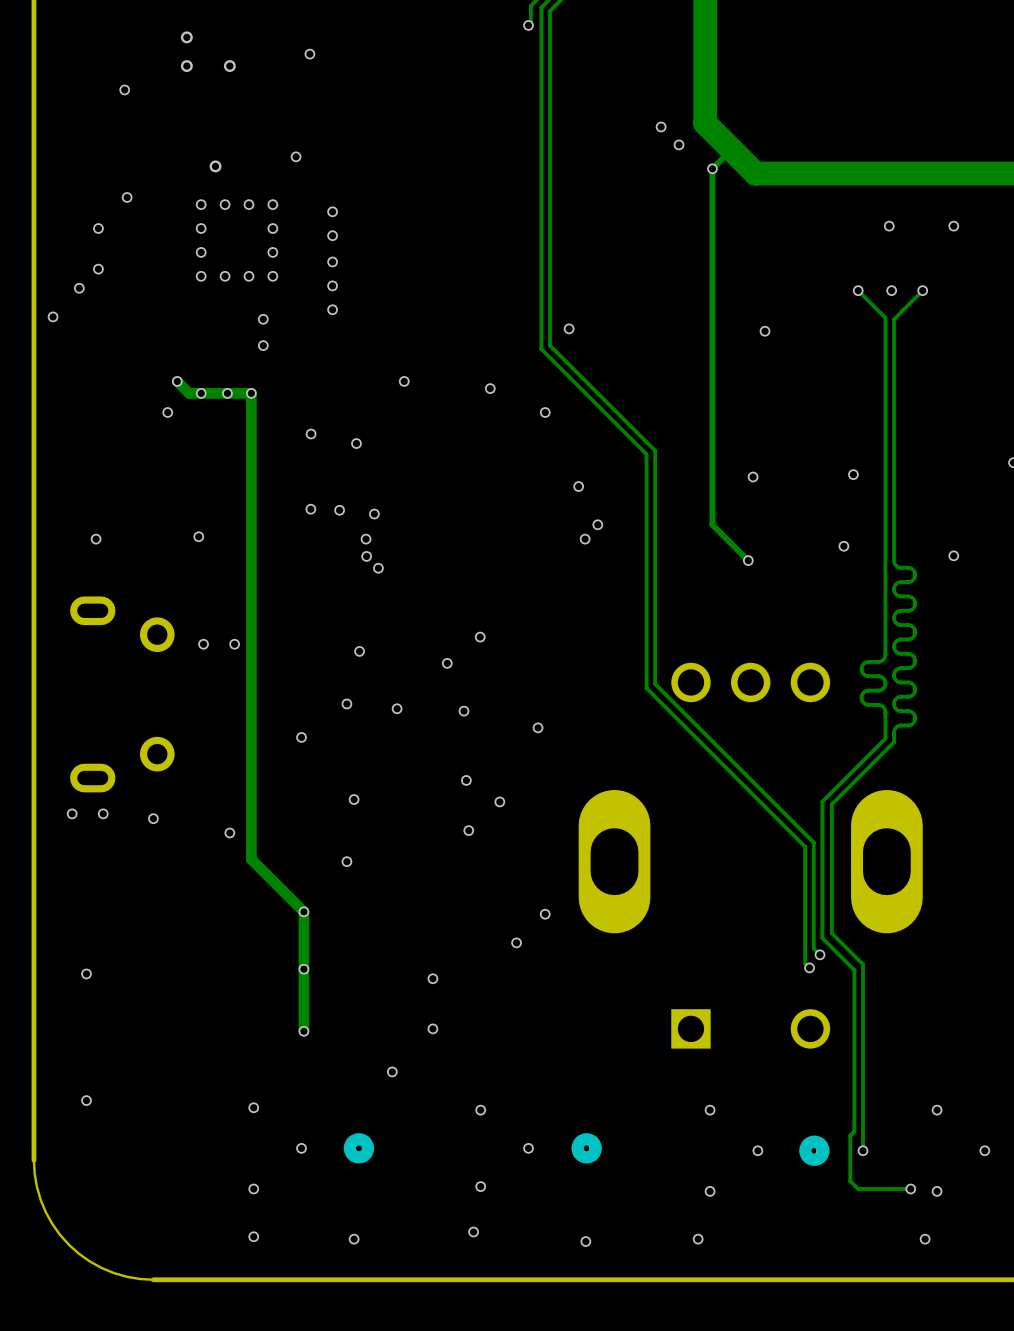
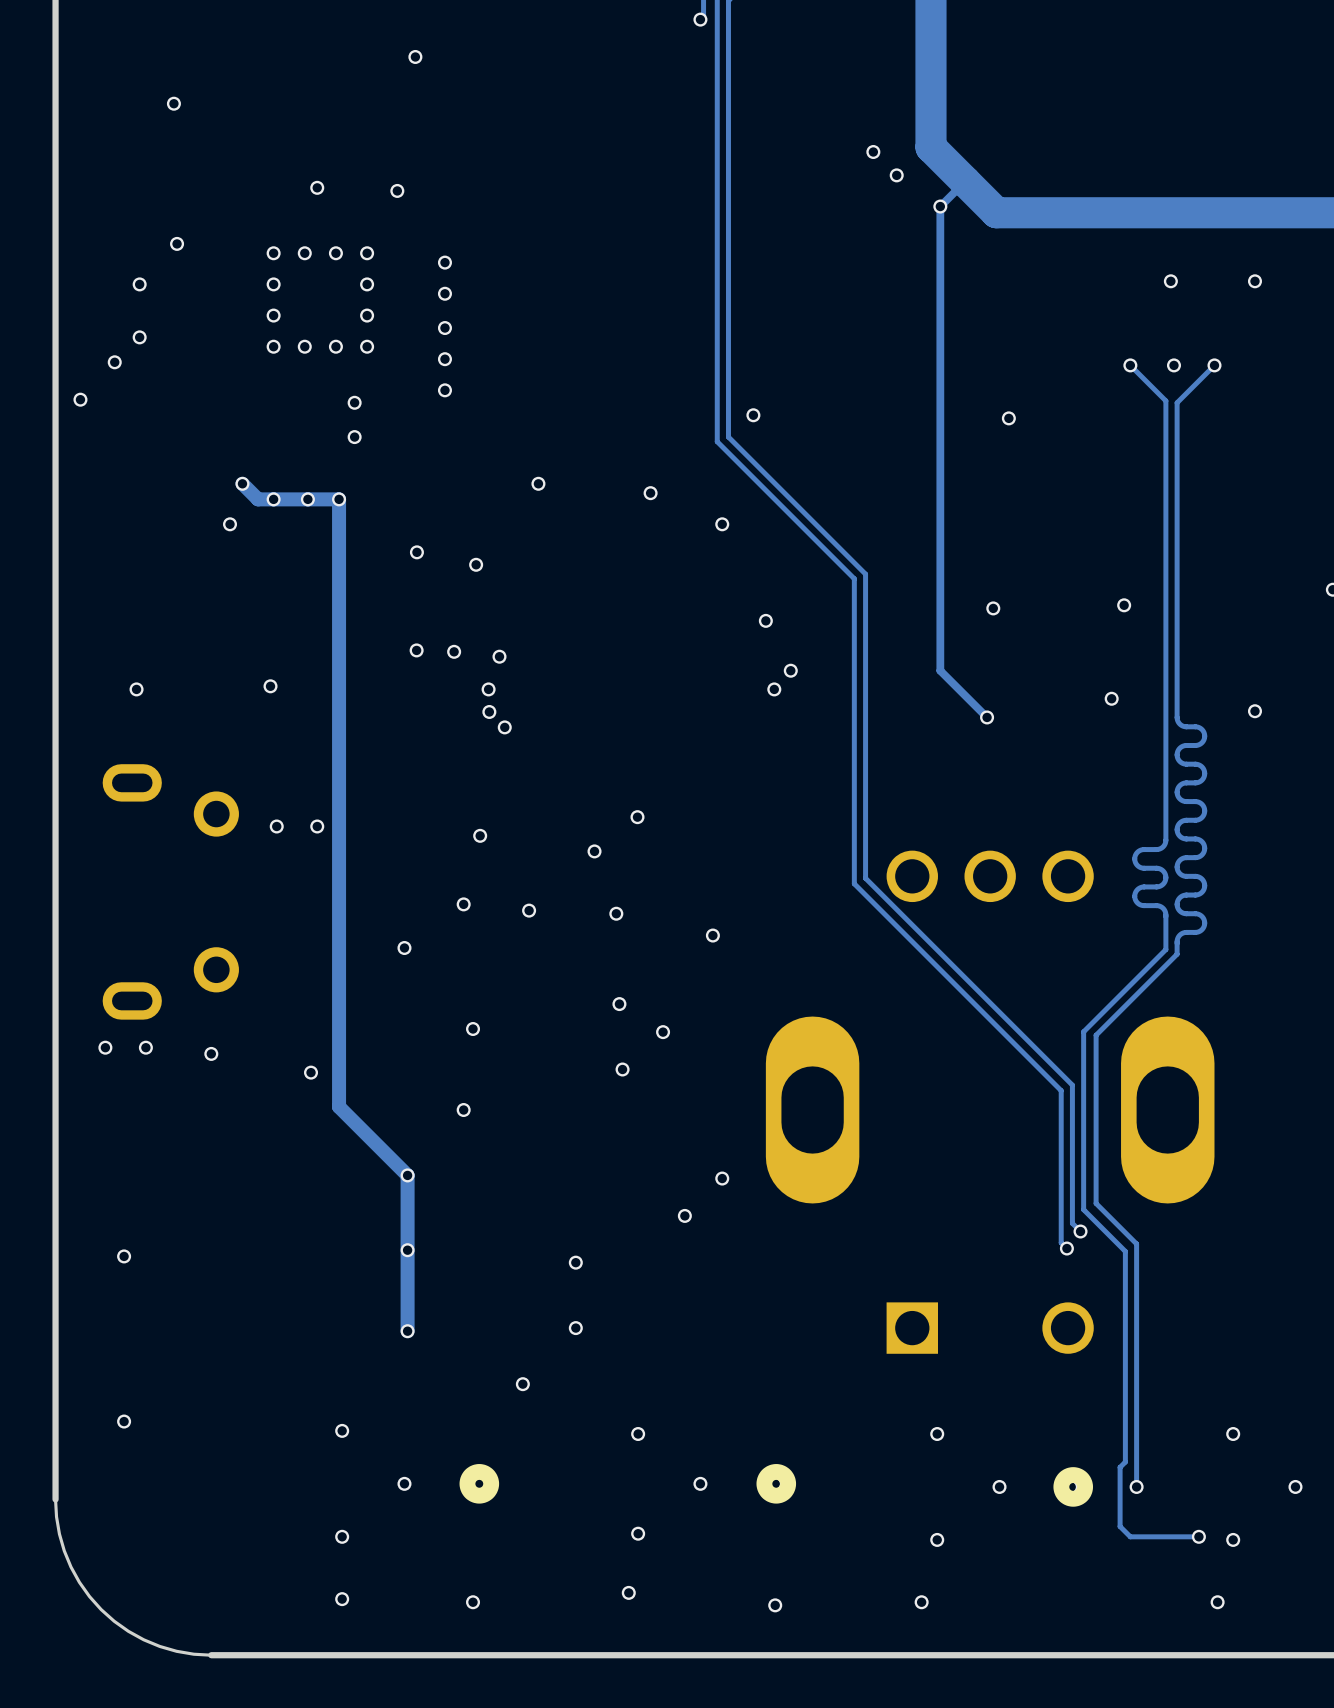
via: (186, 37) -> none
via: (186, 66) -> none
via: (229, 66) -> none
via: none -> (317, 187)
via: (215, 166) -> none

